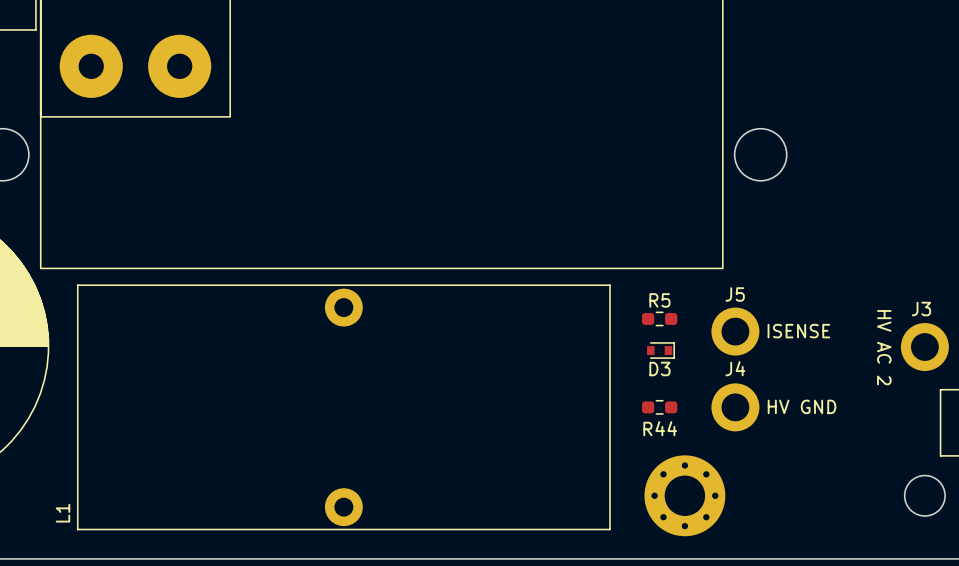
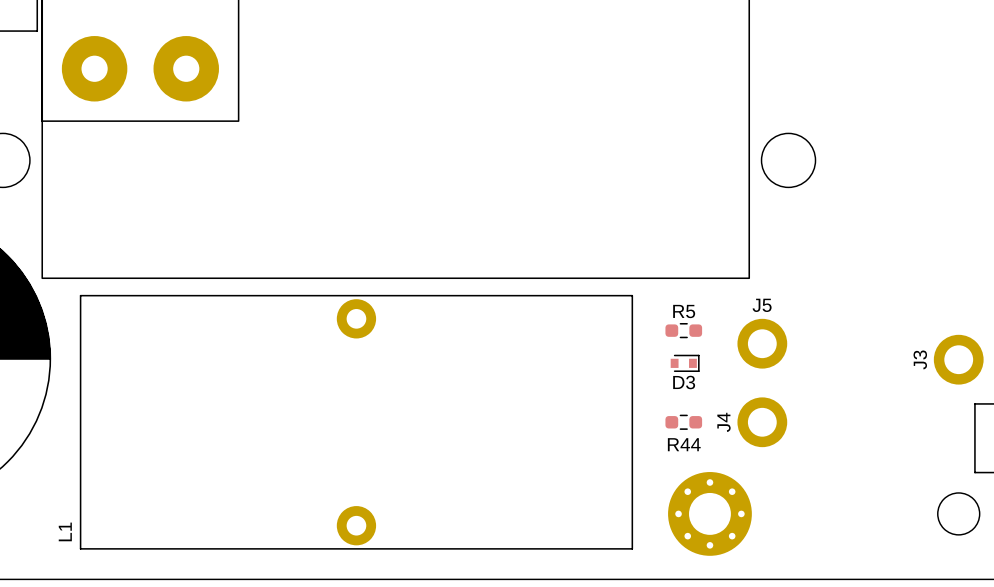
J3 name rotation: 0° (921, 309) -> 90° counterclockwise (920, 359)
J3 name position: J3 (921, 309) -> J3 (920, 359)
text: ISENSE (798, 331) -> none
text: HV AC 2 (884, 347) -> none
J4 name rotation: 0° (735, 368) -> 90° counterclockwise (723, 422)
J4 name position: J4 (735, 368) -> J4 (723, 422)
text: HV GND (802, 406) -> none

